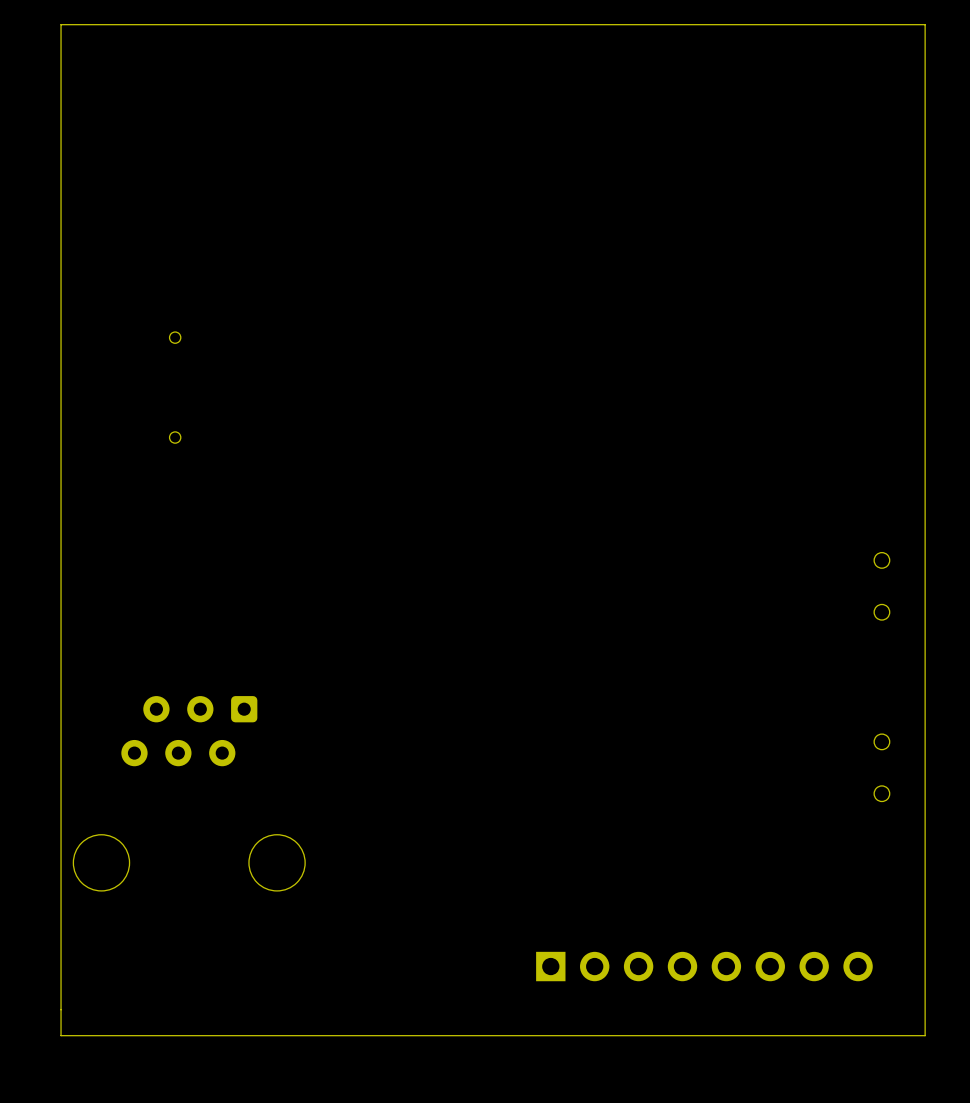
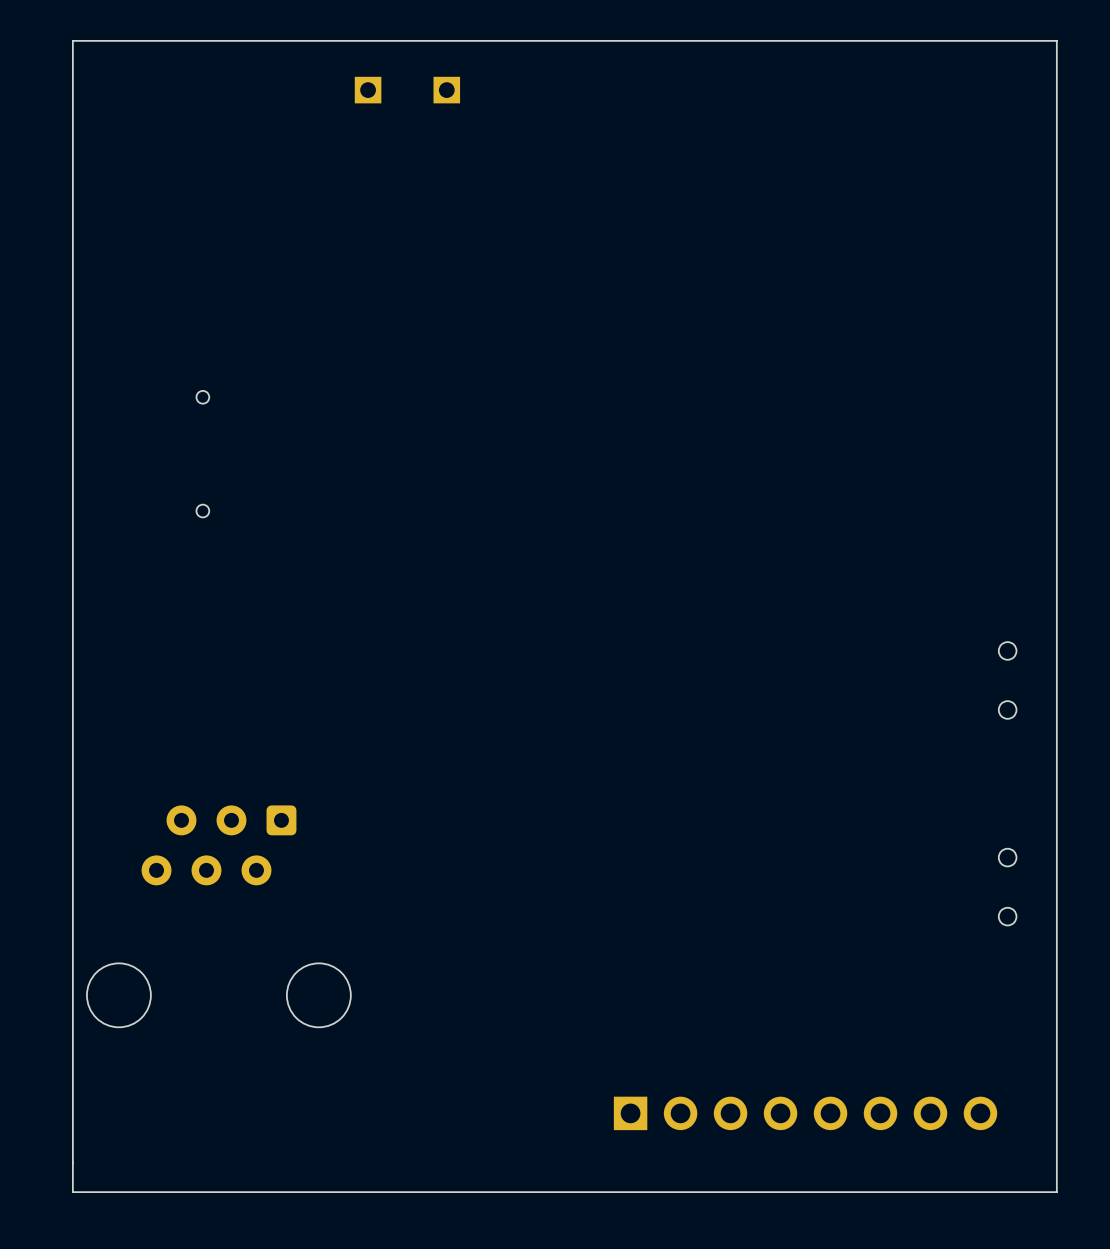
part: none -> (368, 90)
part: none -> (446, 90)

